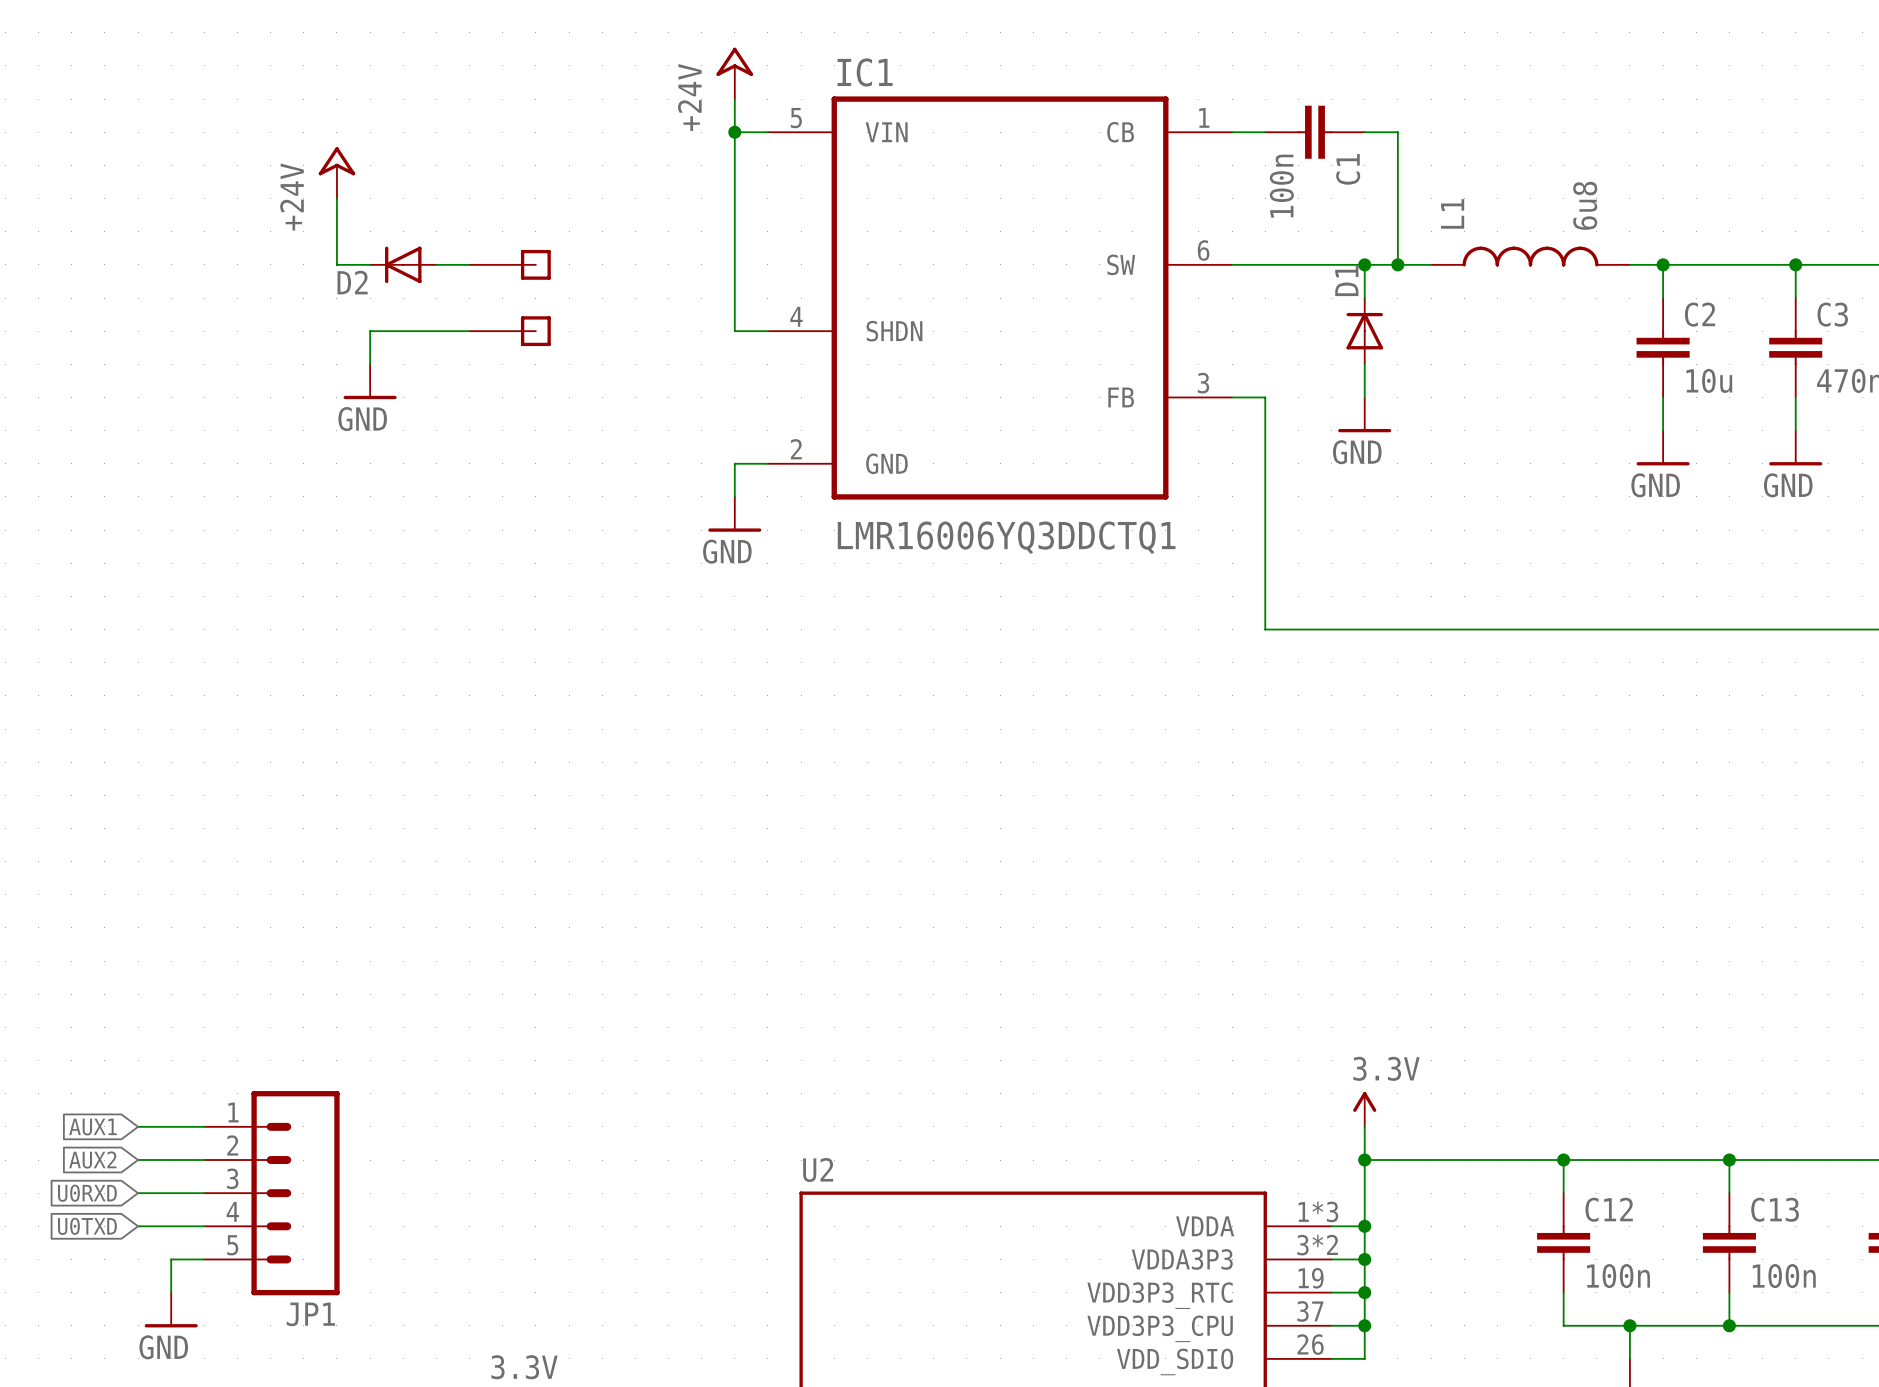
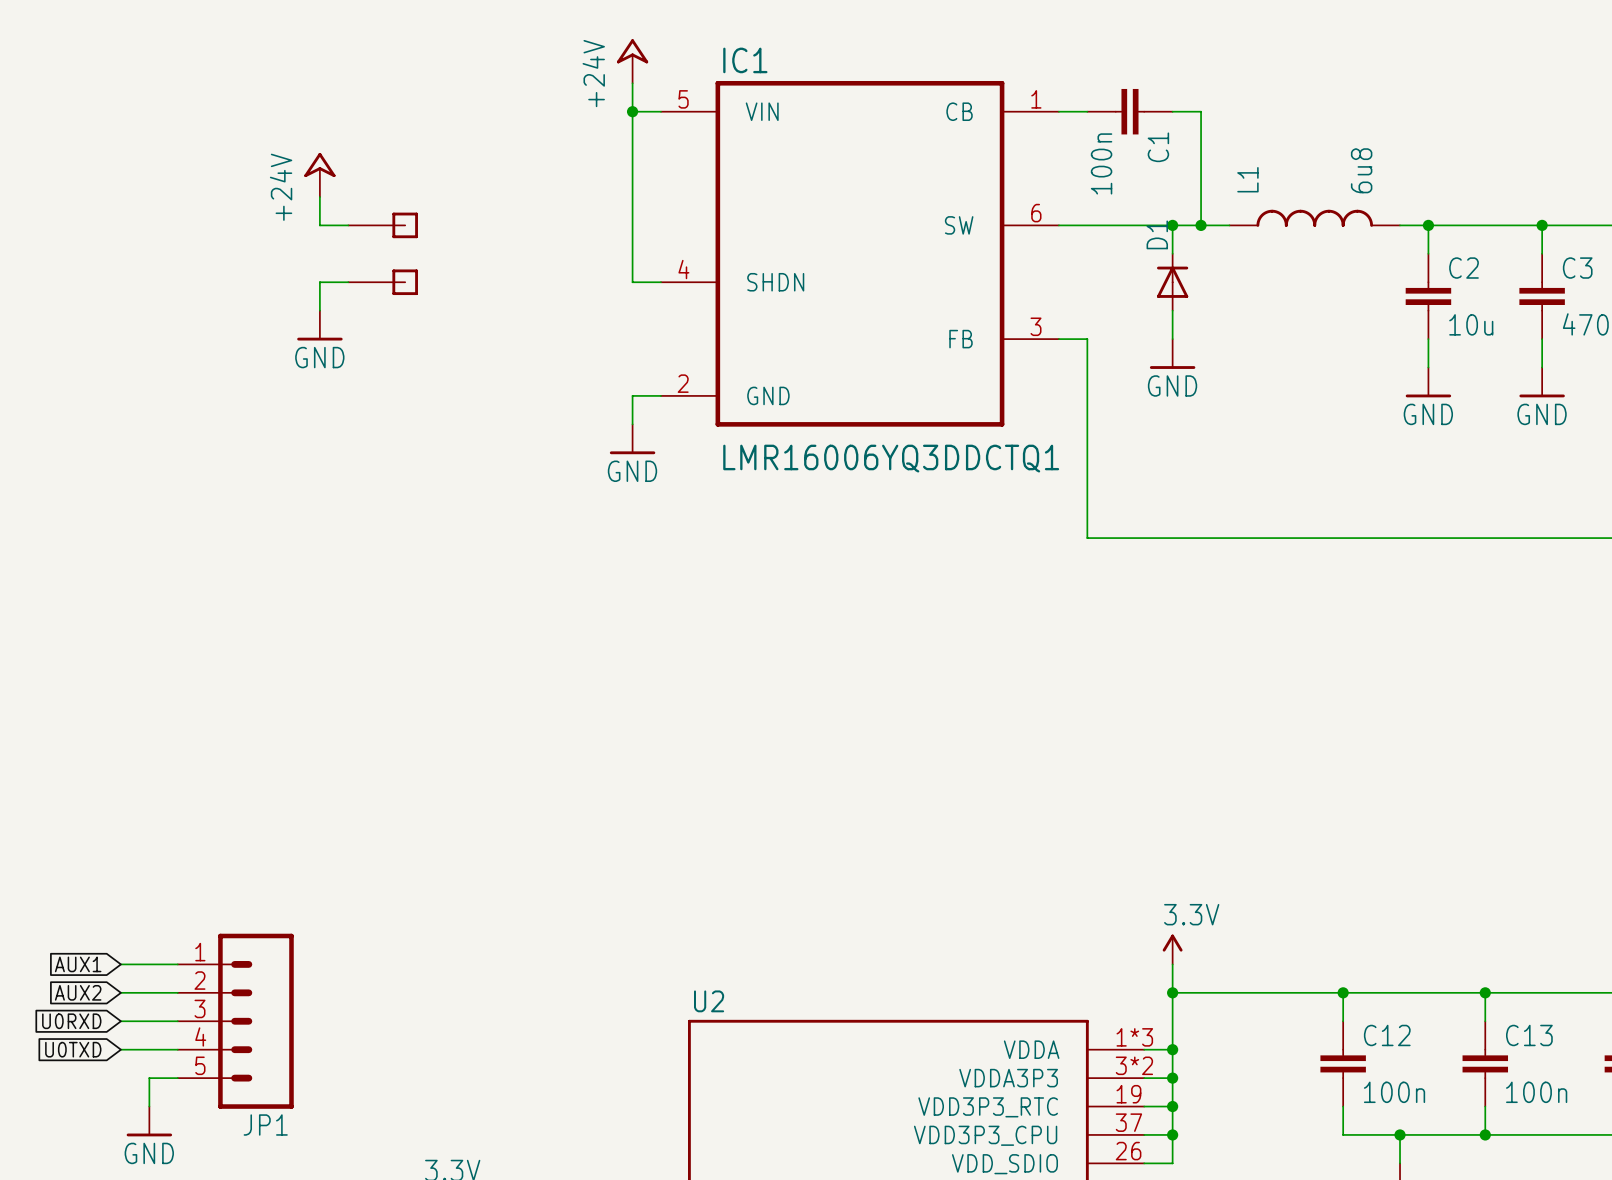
power symbol position: +24V (336, 172) -> +24V (319, 174)
wire: (336, 198) (336, 264) (370, 264) -> none
wire: none -> (319, 196) (319, 225) (348, 225)
D2: (403, 264) -> none
part: none -> (383, 225)
part: (510, 264) -> none
part: none -> (383, 282)
part: (510, 331) -> none

